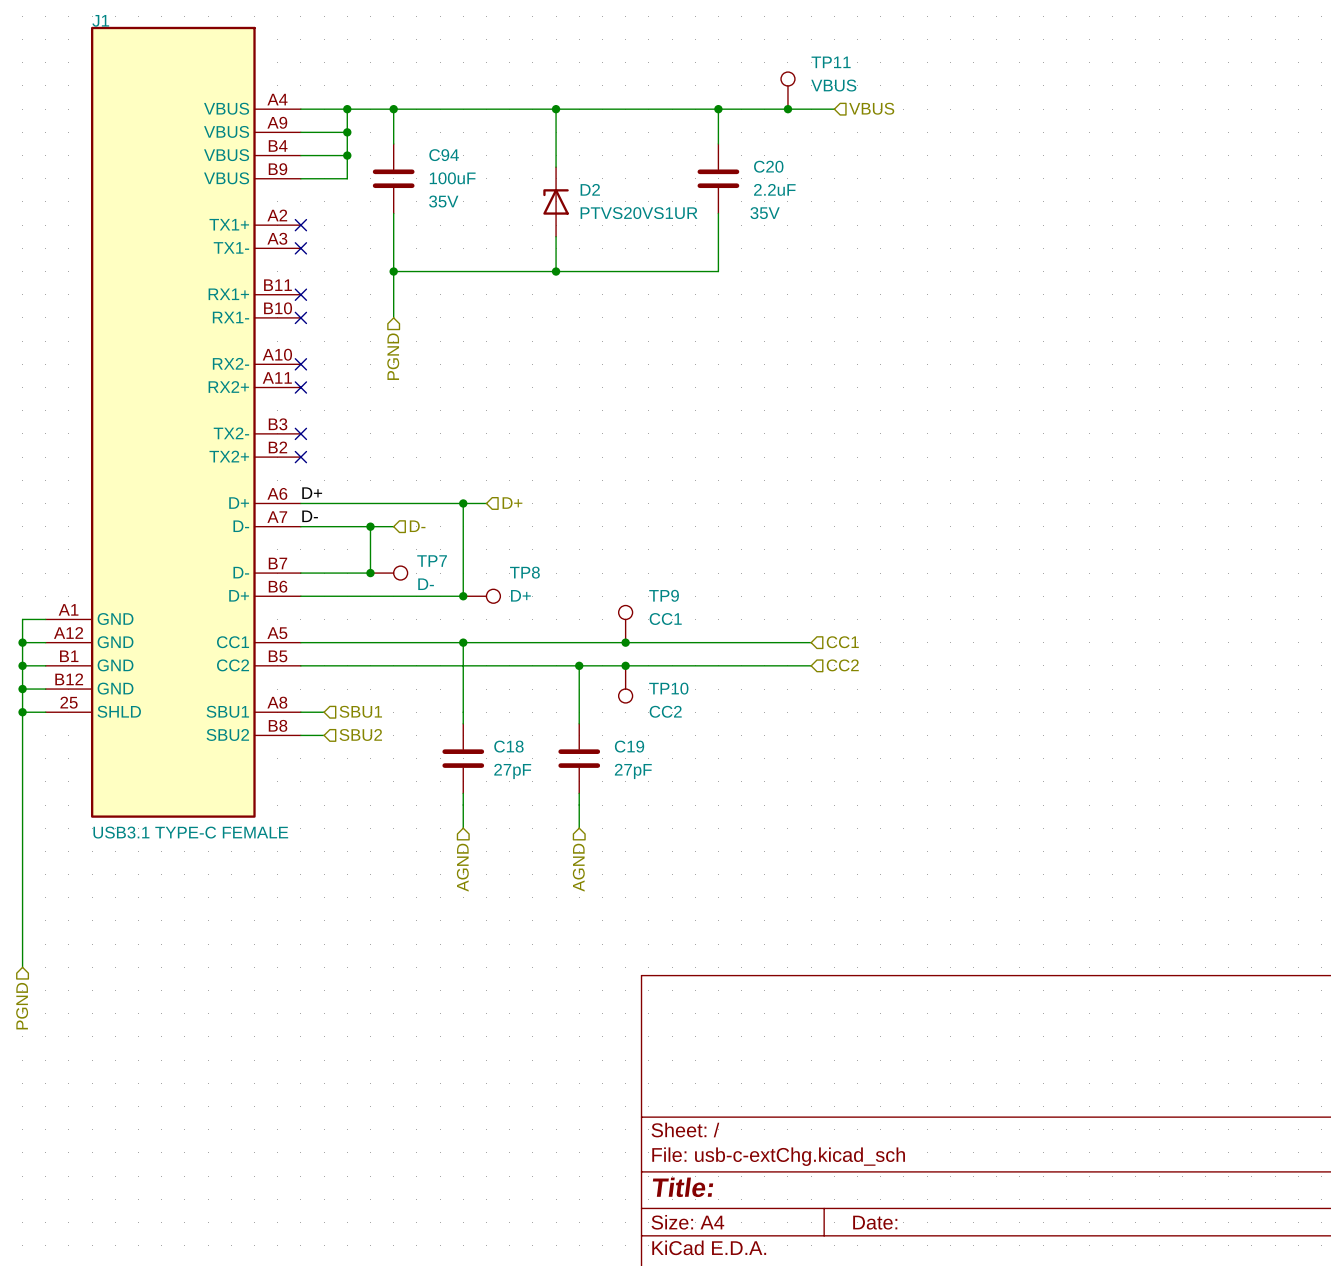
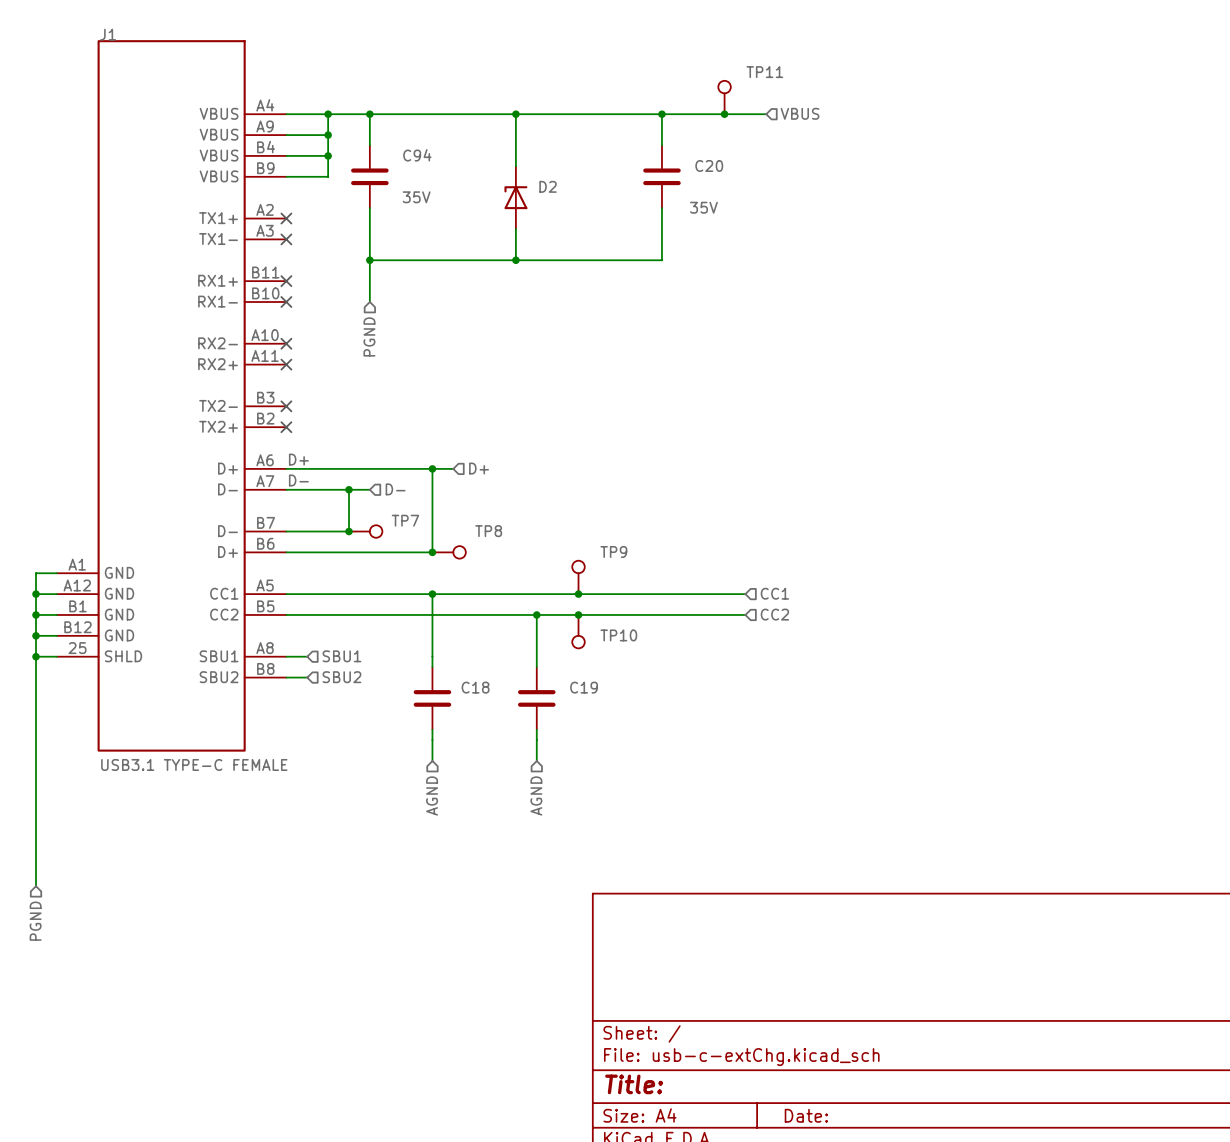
TP11 value: VBUS (833, 85) -> none
C94 value: 100uF (452, 178) -> none
C20 value: 2.2uF (774, 189) -> none
D2 value: PTVS20VS1UR (639, 213) -> none
TP7 value: D- (426, 584) -> none
TP8 value: D+ (520, 595) -> none
TP9 value: CC1 (665, 619) -> none
TP10 value: CC2 (665, 711) -> none
C18 value: 27pF (512, 771) -> none
C19 value: 27pF (633, 771) -> none

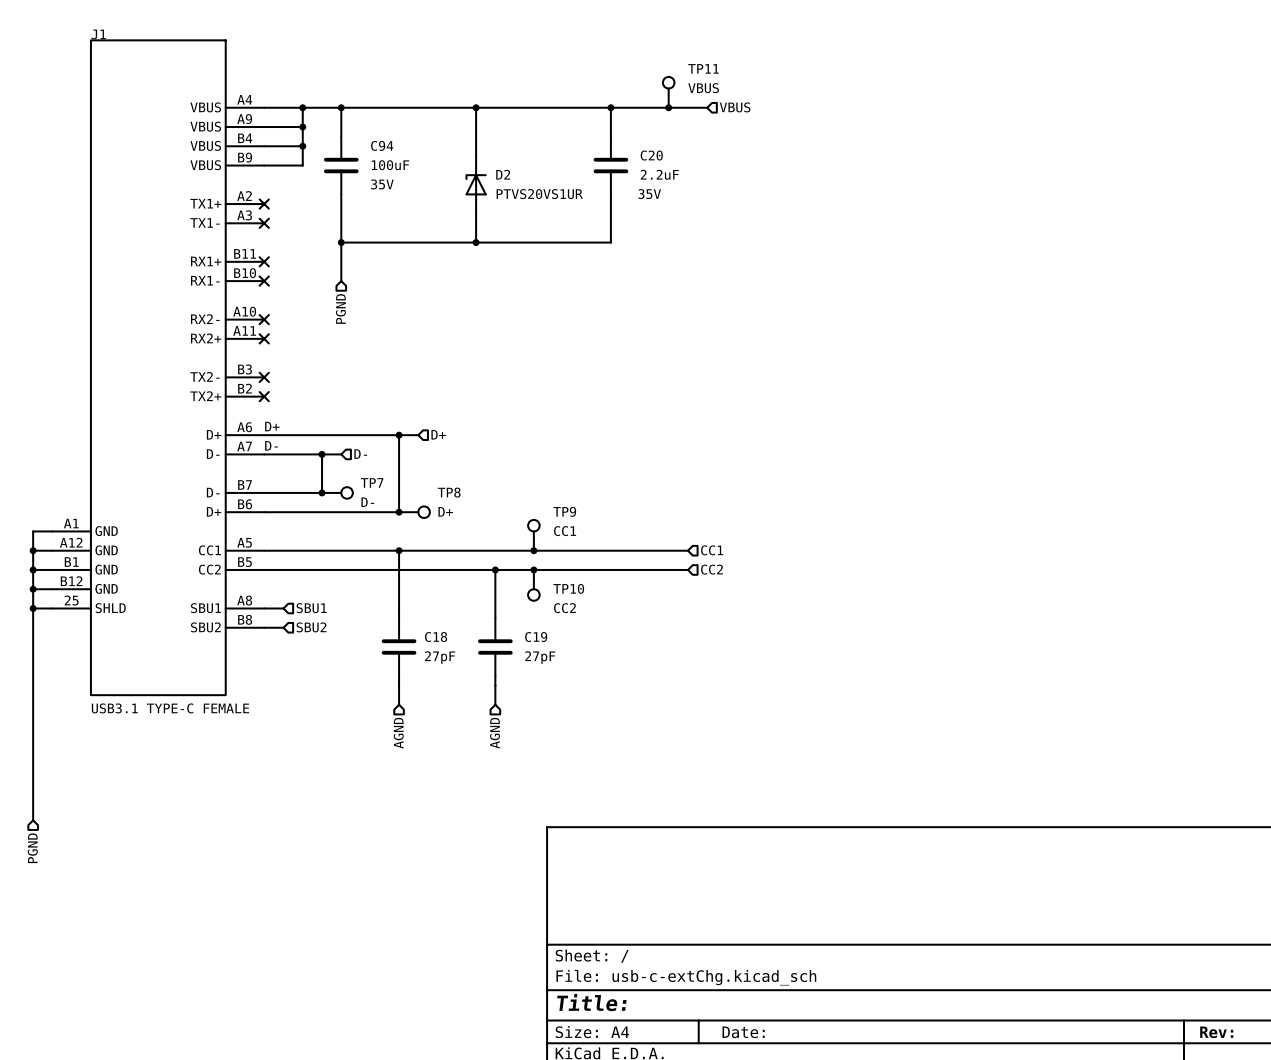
TP11 value: none -> VBUS (703, 88)
C94 value: none -> 100uF (390, 165)
C20 value: none -> 2.2uF (659, 174)
D2 value: none -> PTVS20VS1UR (539, 194)
TP7 value: none -> D- (367, 502)
TP8 value: none -> D+ (445, 511)
TP9 value: none -> CC1 (565, 531)
TP10 value: none -> CC2 (564, 608)
C18 value: none -> 27pF (440, 657)
C19 value: none -> 27pF (540, 657)

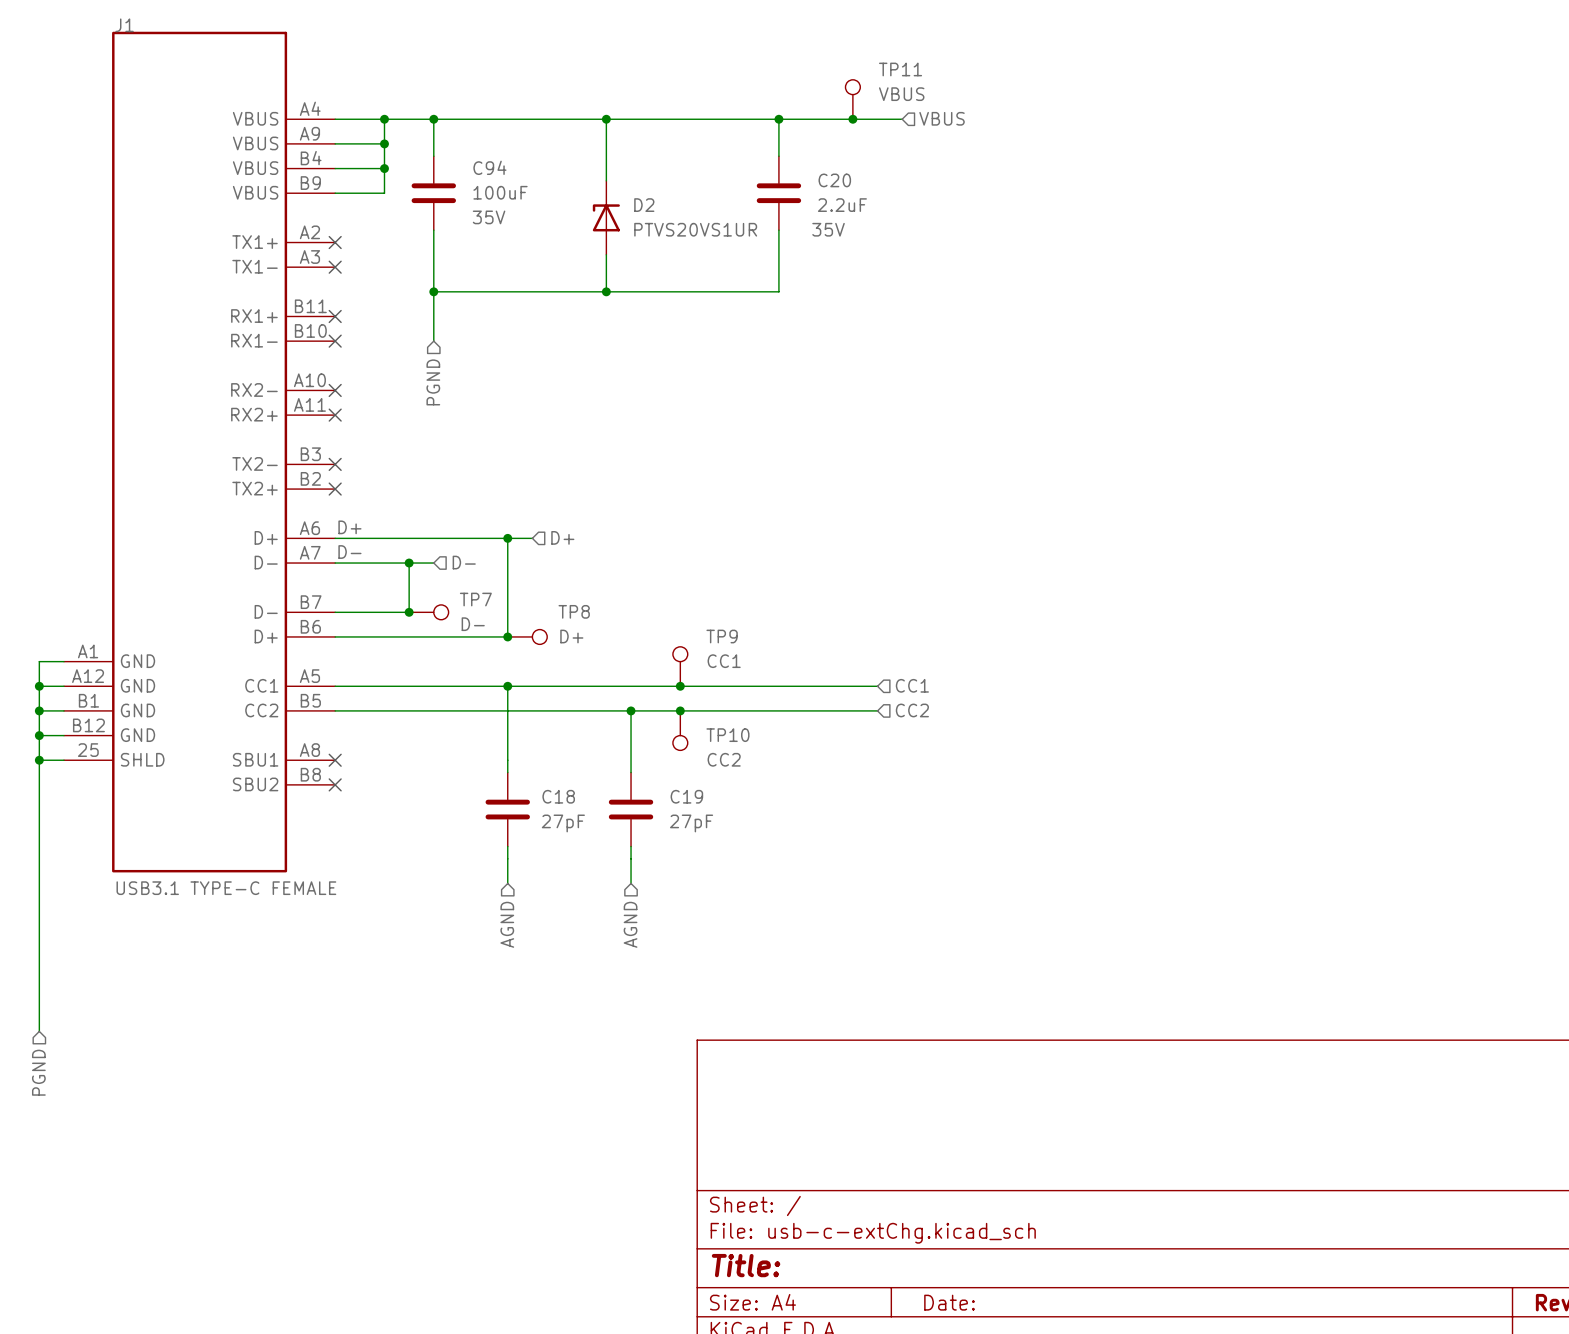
wire: (264, 608) (283, 608) -> none
no-connect mark: none -> (335, 760)
hierarchical label: SBU1 (311, 608) -> none
wire: (264, 627) (283, 627) -> none
no-connect mark: none -> (335, 784)
hierarchical label: SBU2 (311, 627) -> none

